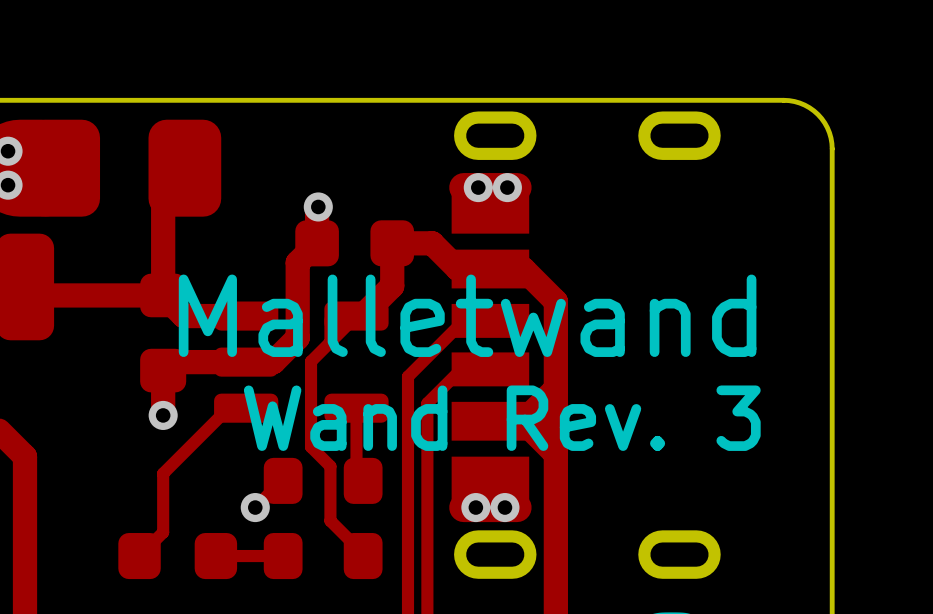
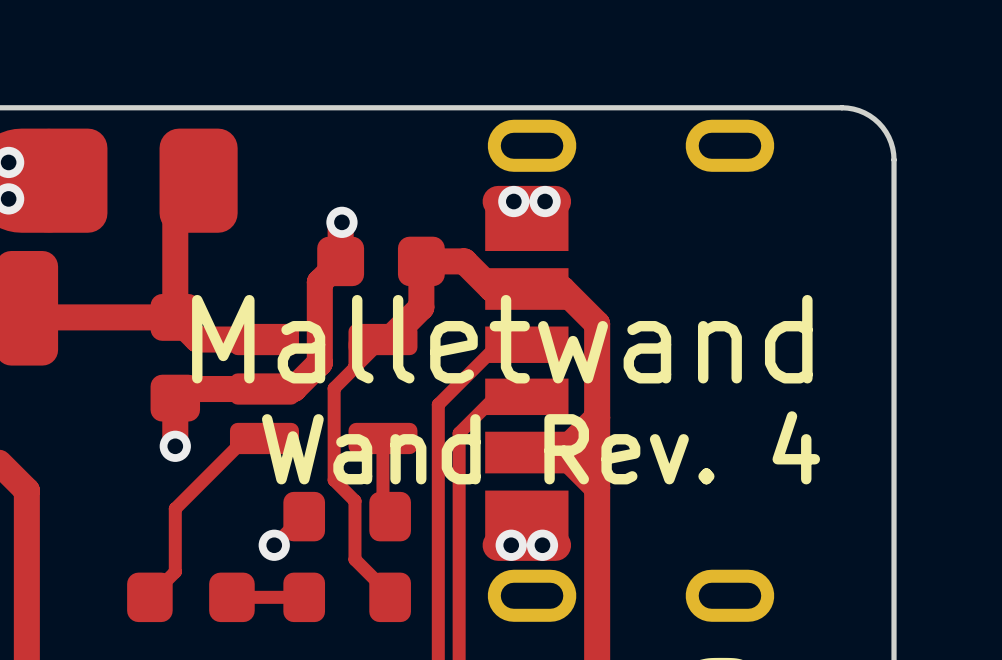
text: Wand Rev. 3 (502, 418) -> Wand Rev. 4 (541, 447)

